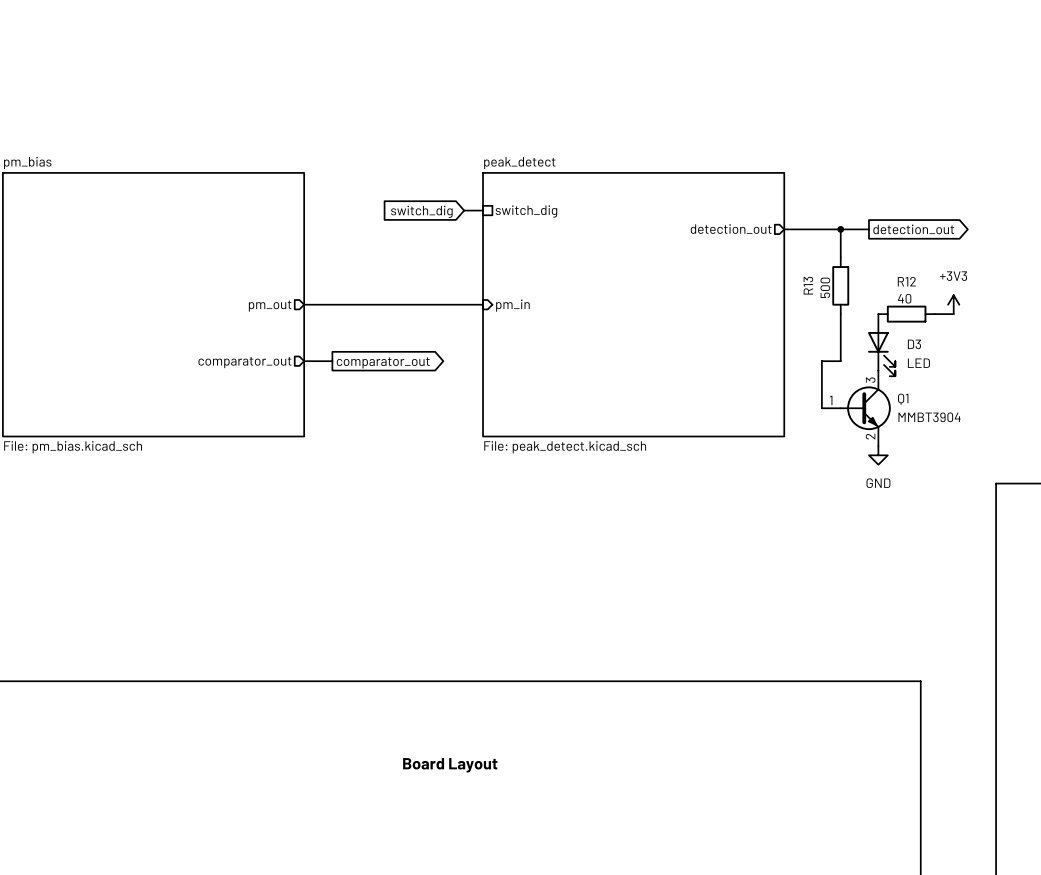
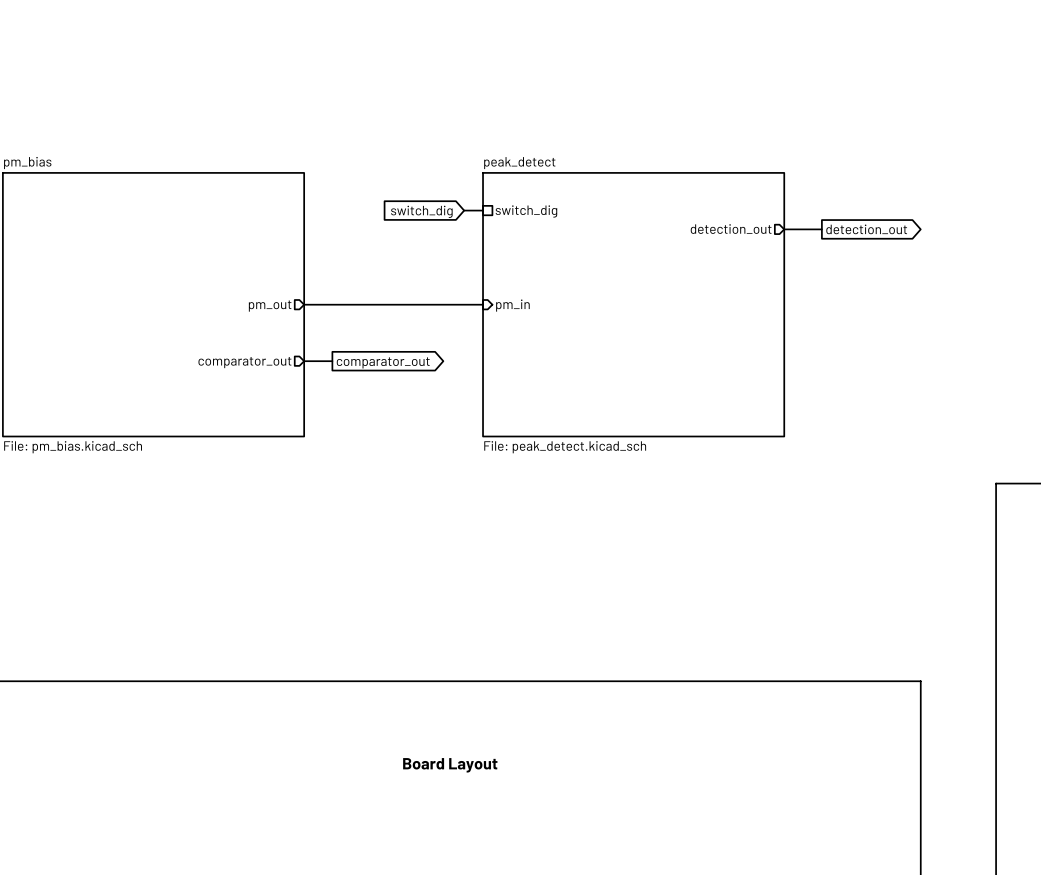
wire: (821, 229) (868, 229) -> none
wire: (840, 229) (840, 257) -> none
junction: (840, 229) -> none
global label position: detection_out (913, 229) -> detection_out (866, 229)
R13: 500 (840, 285) -> none
power symbol: +3V3 (953, 304) -> none
wire: (840, 314) (840, 361) (821, 361) (821, 408) -> none
R12: 40 (906, 314) -> none
wire: (934, 314) (953, 314) -> none
D3: LED (881, 345) -> none
Q1: MMBT3904 (856, 408) -> none
power symbol: GND (878, 455) -> none

